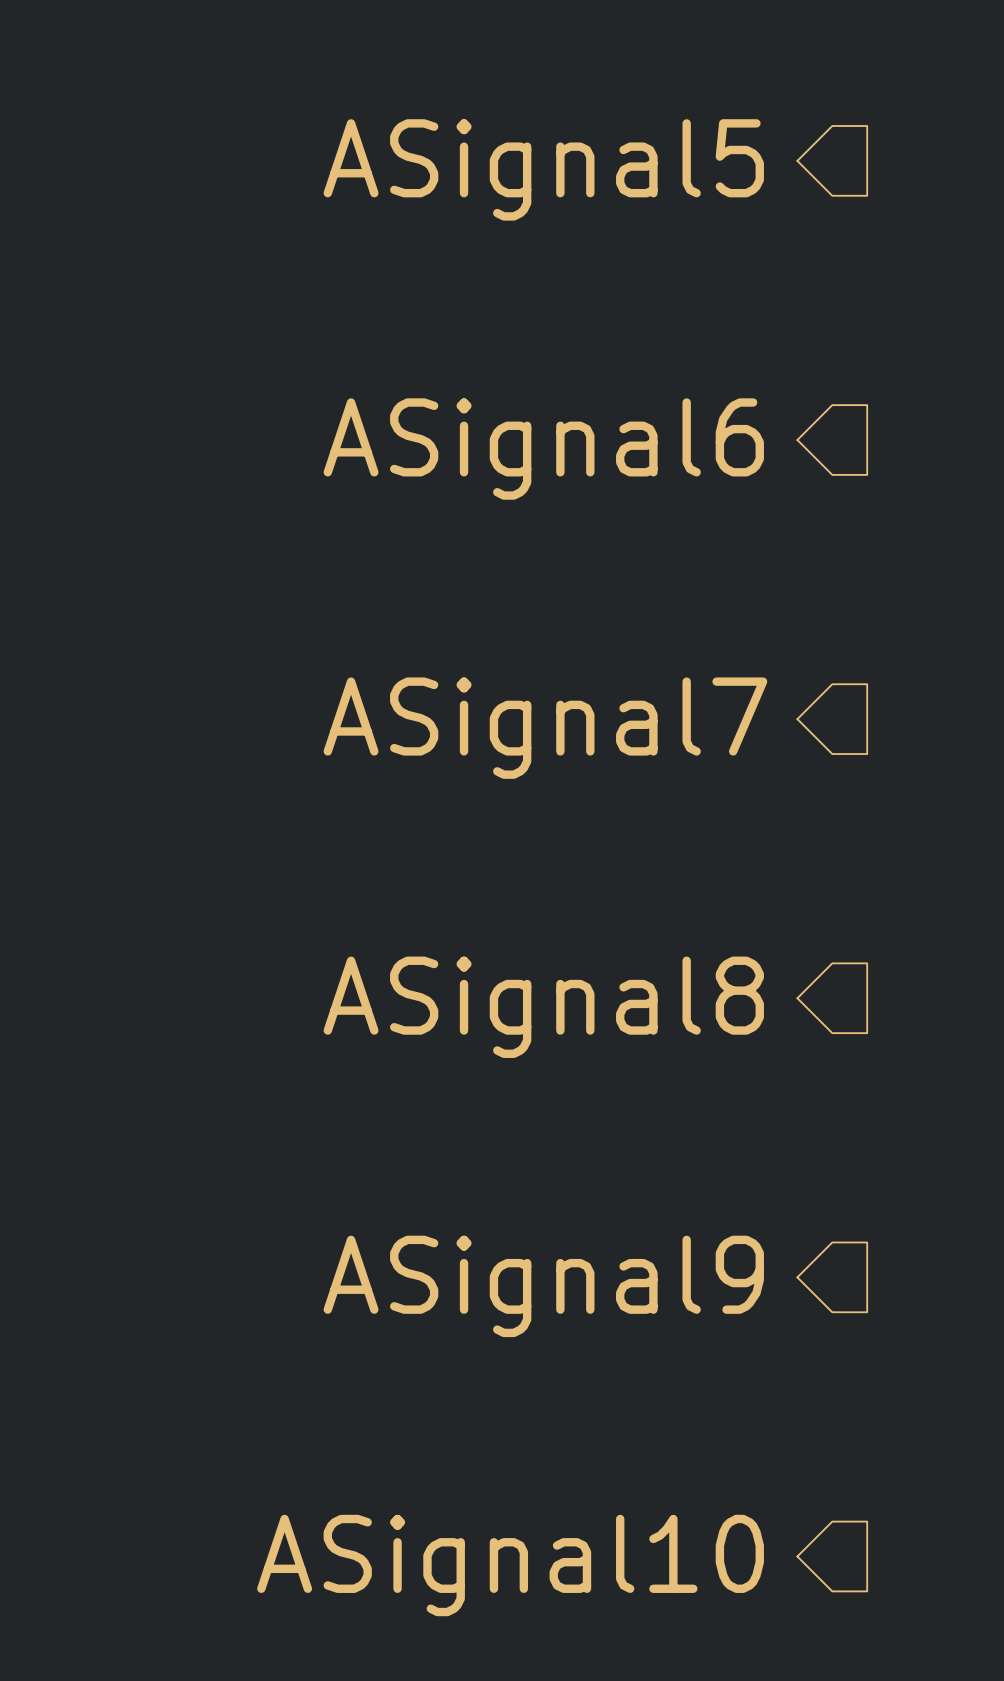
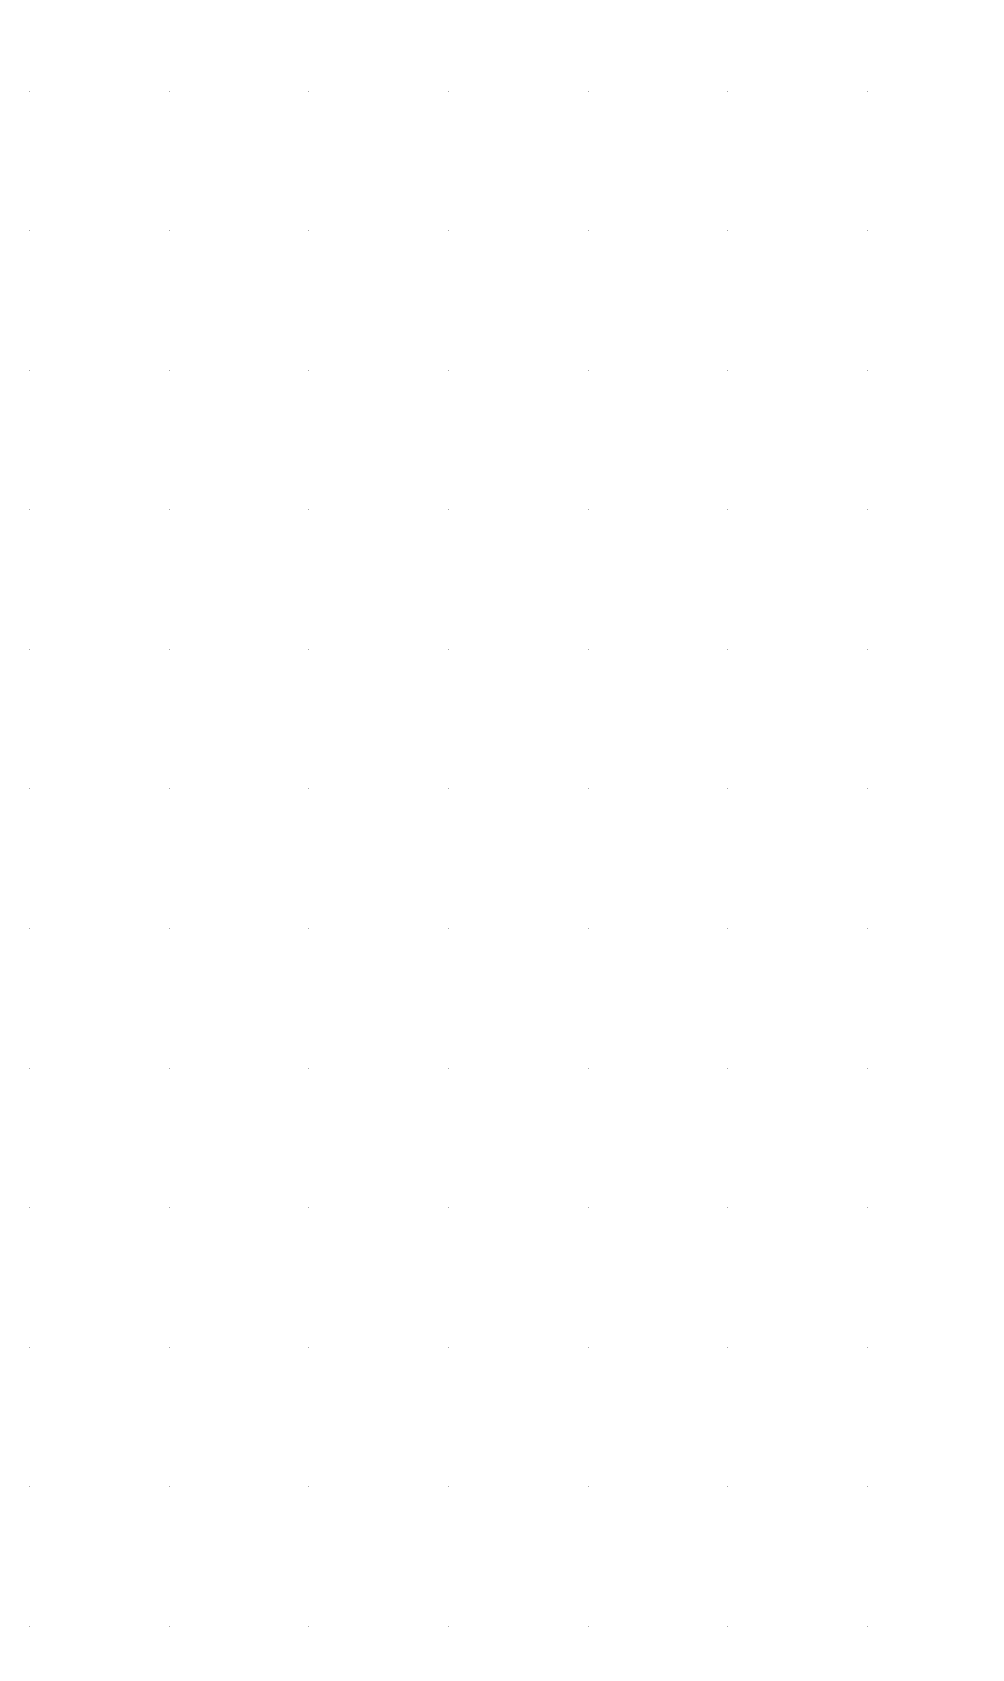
hierarchical label: ASignal5 (543, 169) -> none
hierarchical label: ASignal6 (543, 449) -> none
hierarchical label: ASignal7 (545, 728) -> none
hierarchical label: ASignal8 (543, 1007) -> none
hierarchical label: ASignal9 (543, 1286) -> none
hierarchical label: ASignal10 (510, 1565) -> none

